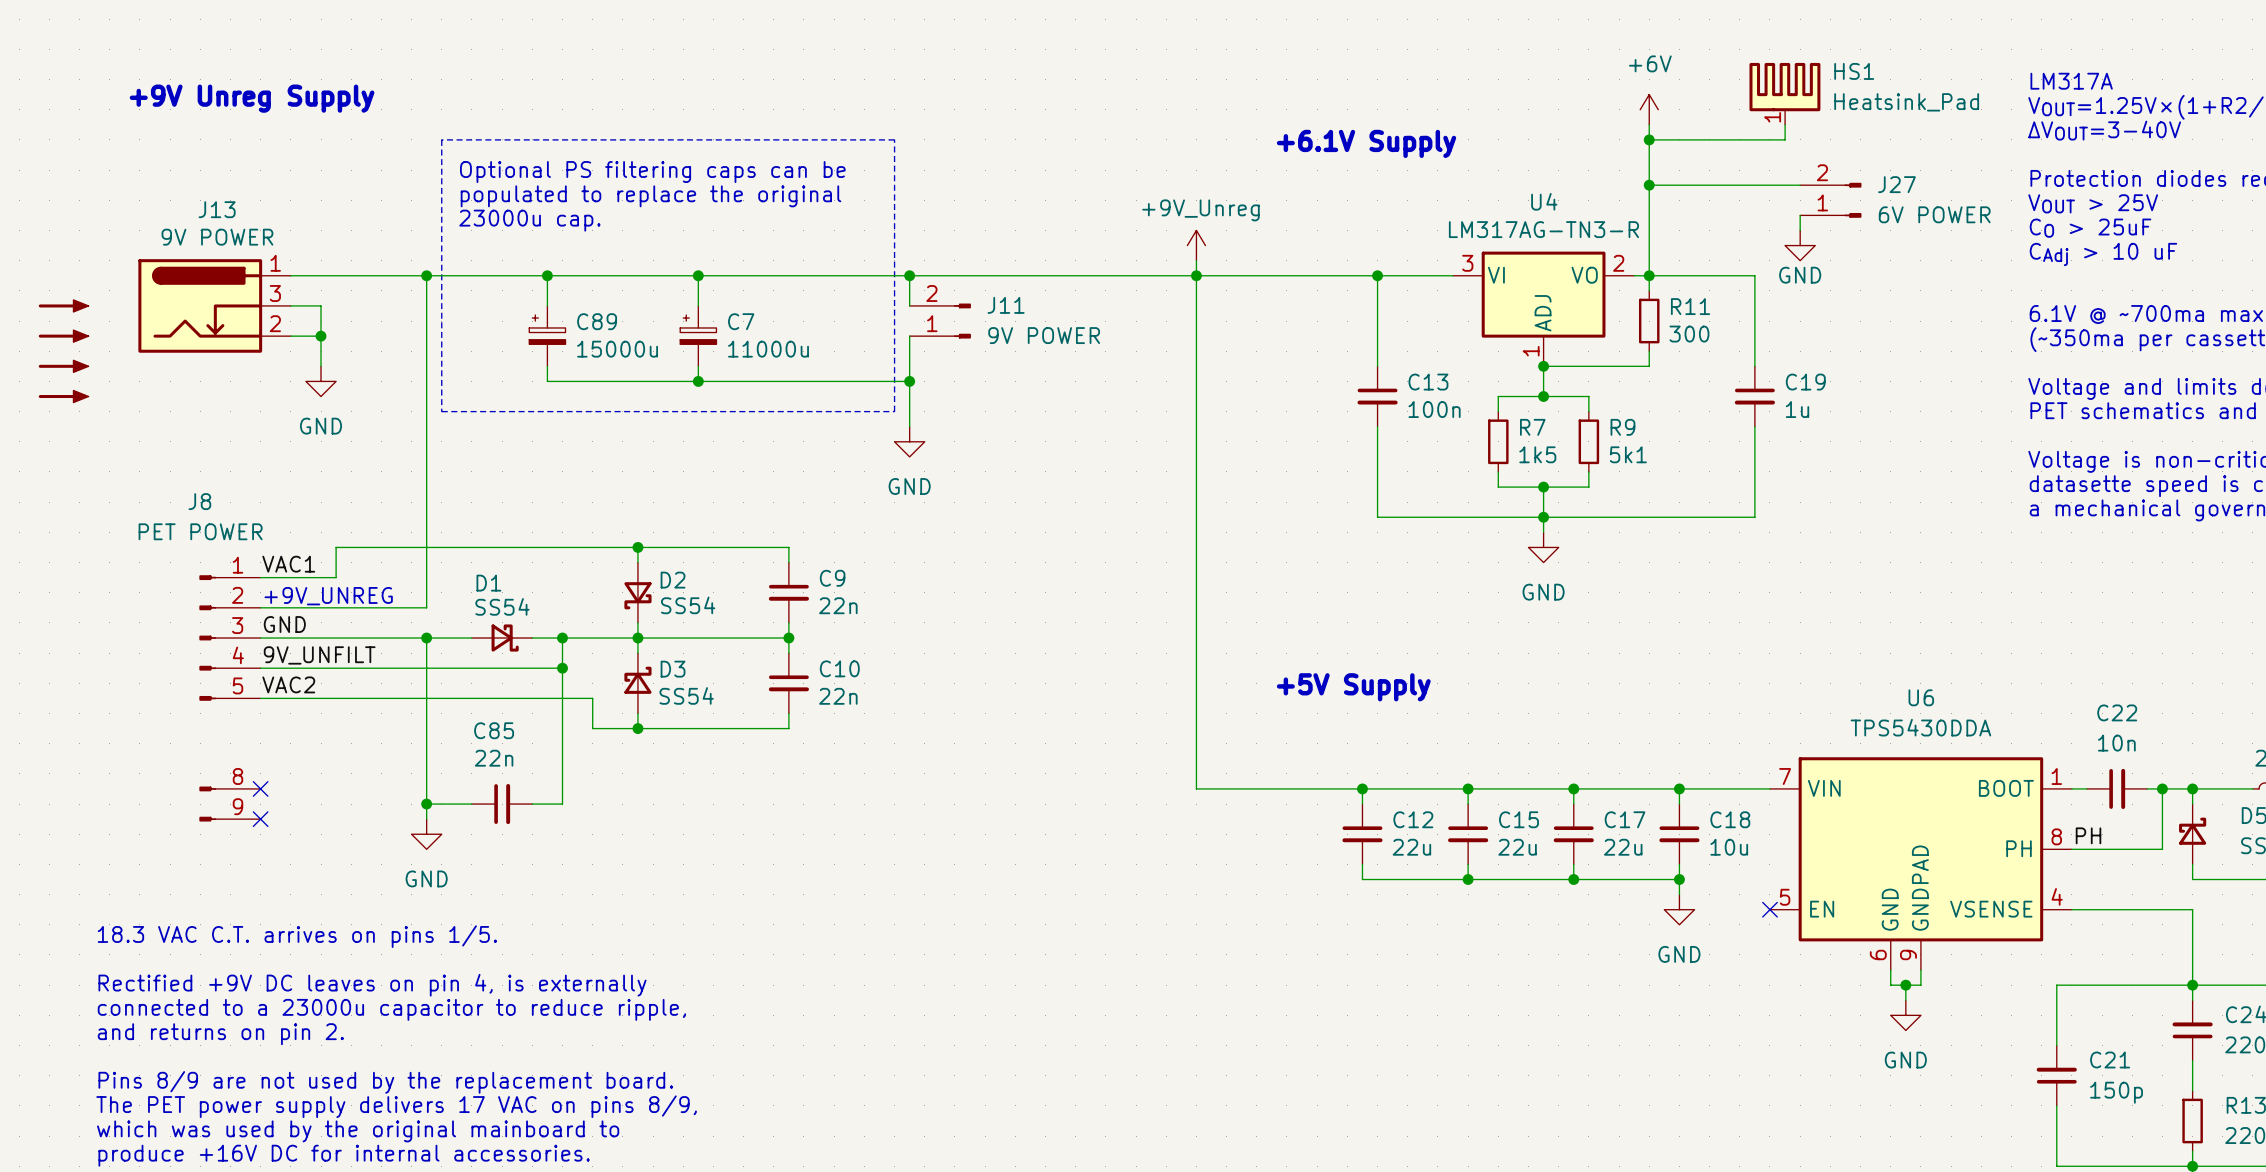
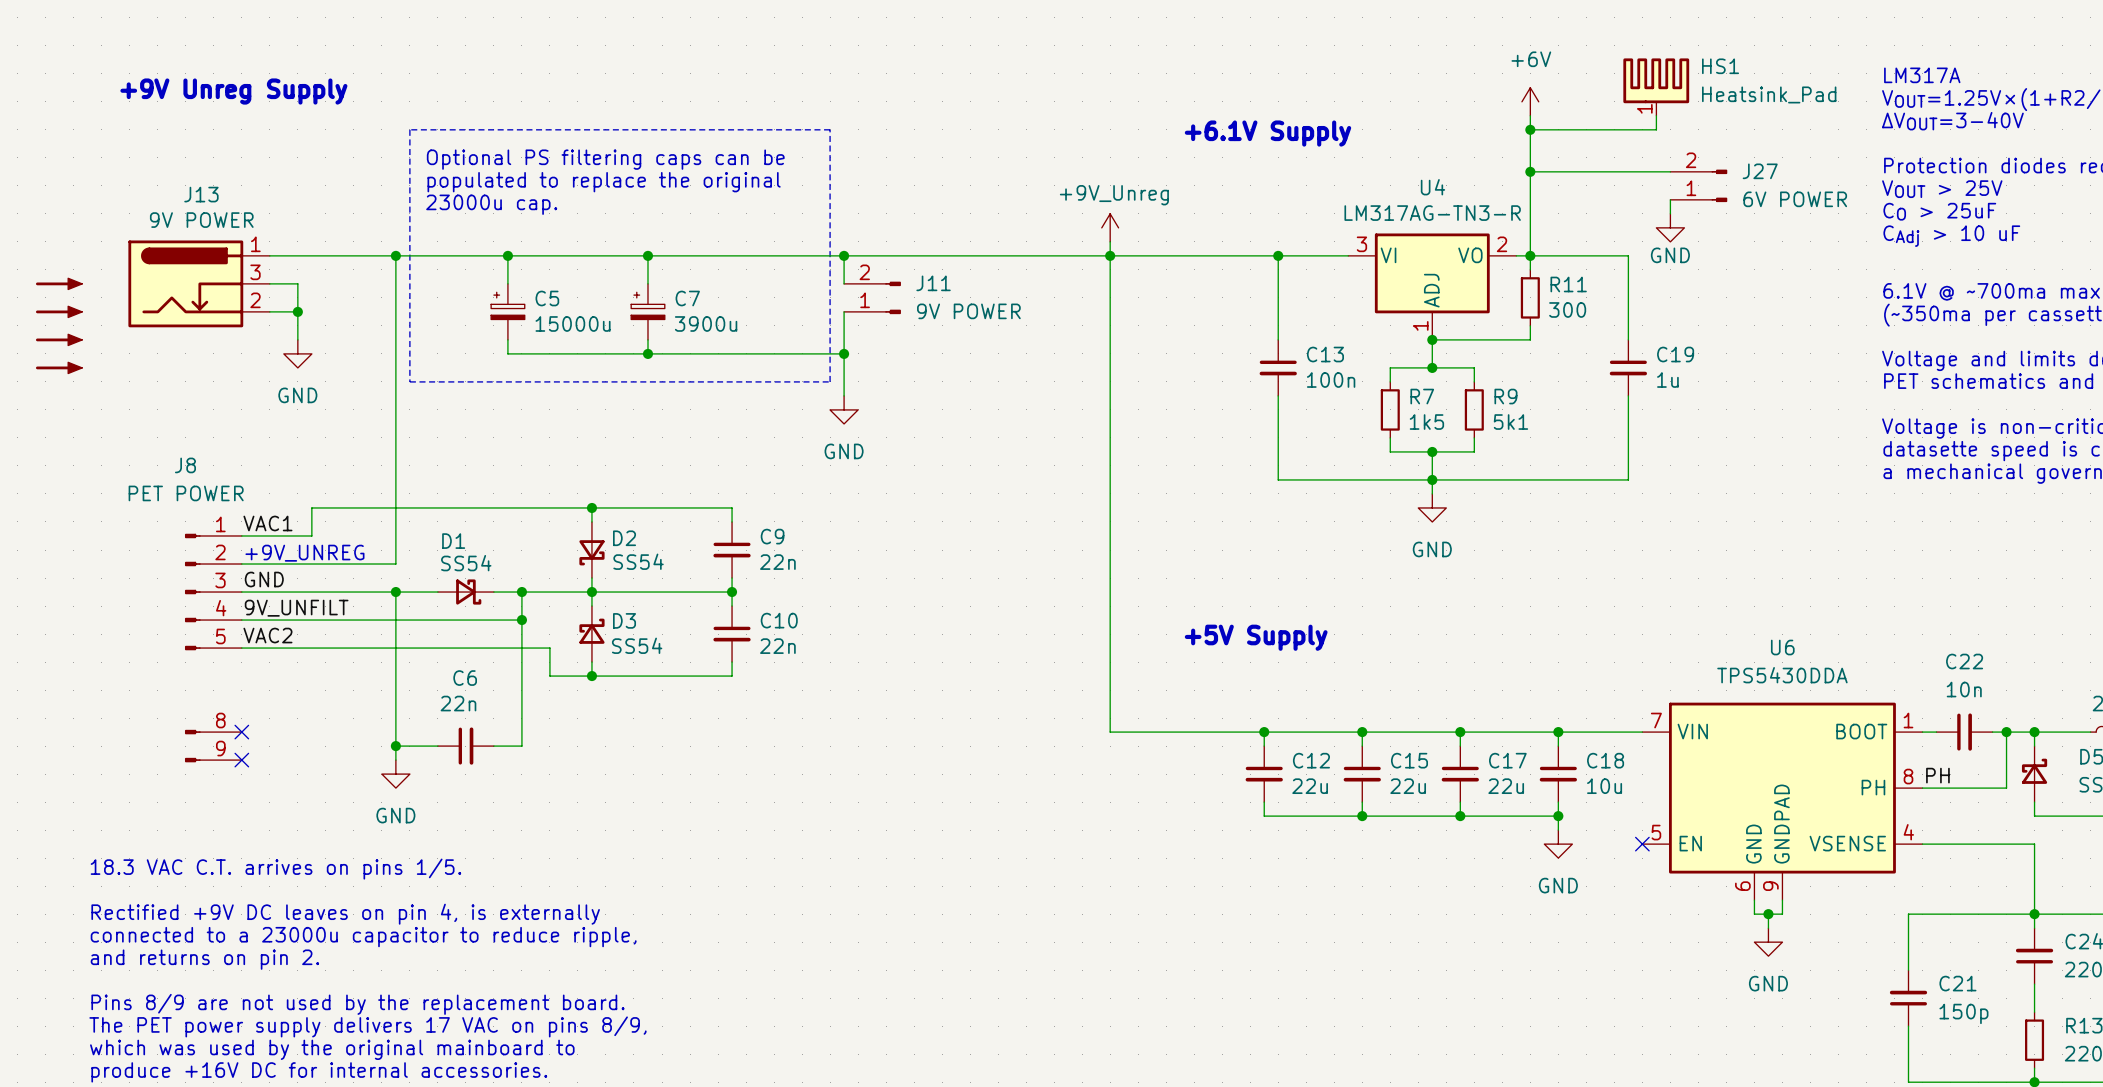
C89 name: C89 (597, 321) -> C5 (547, 298)
C7 value: 11000u (768, 349) -> 3900u (706, 323)
C85 name: C85 (494, 730) -> C6 (465, 678)

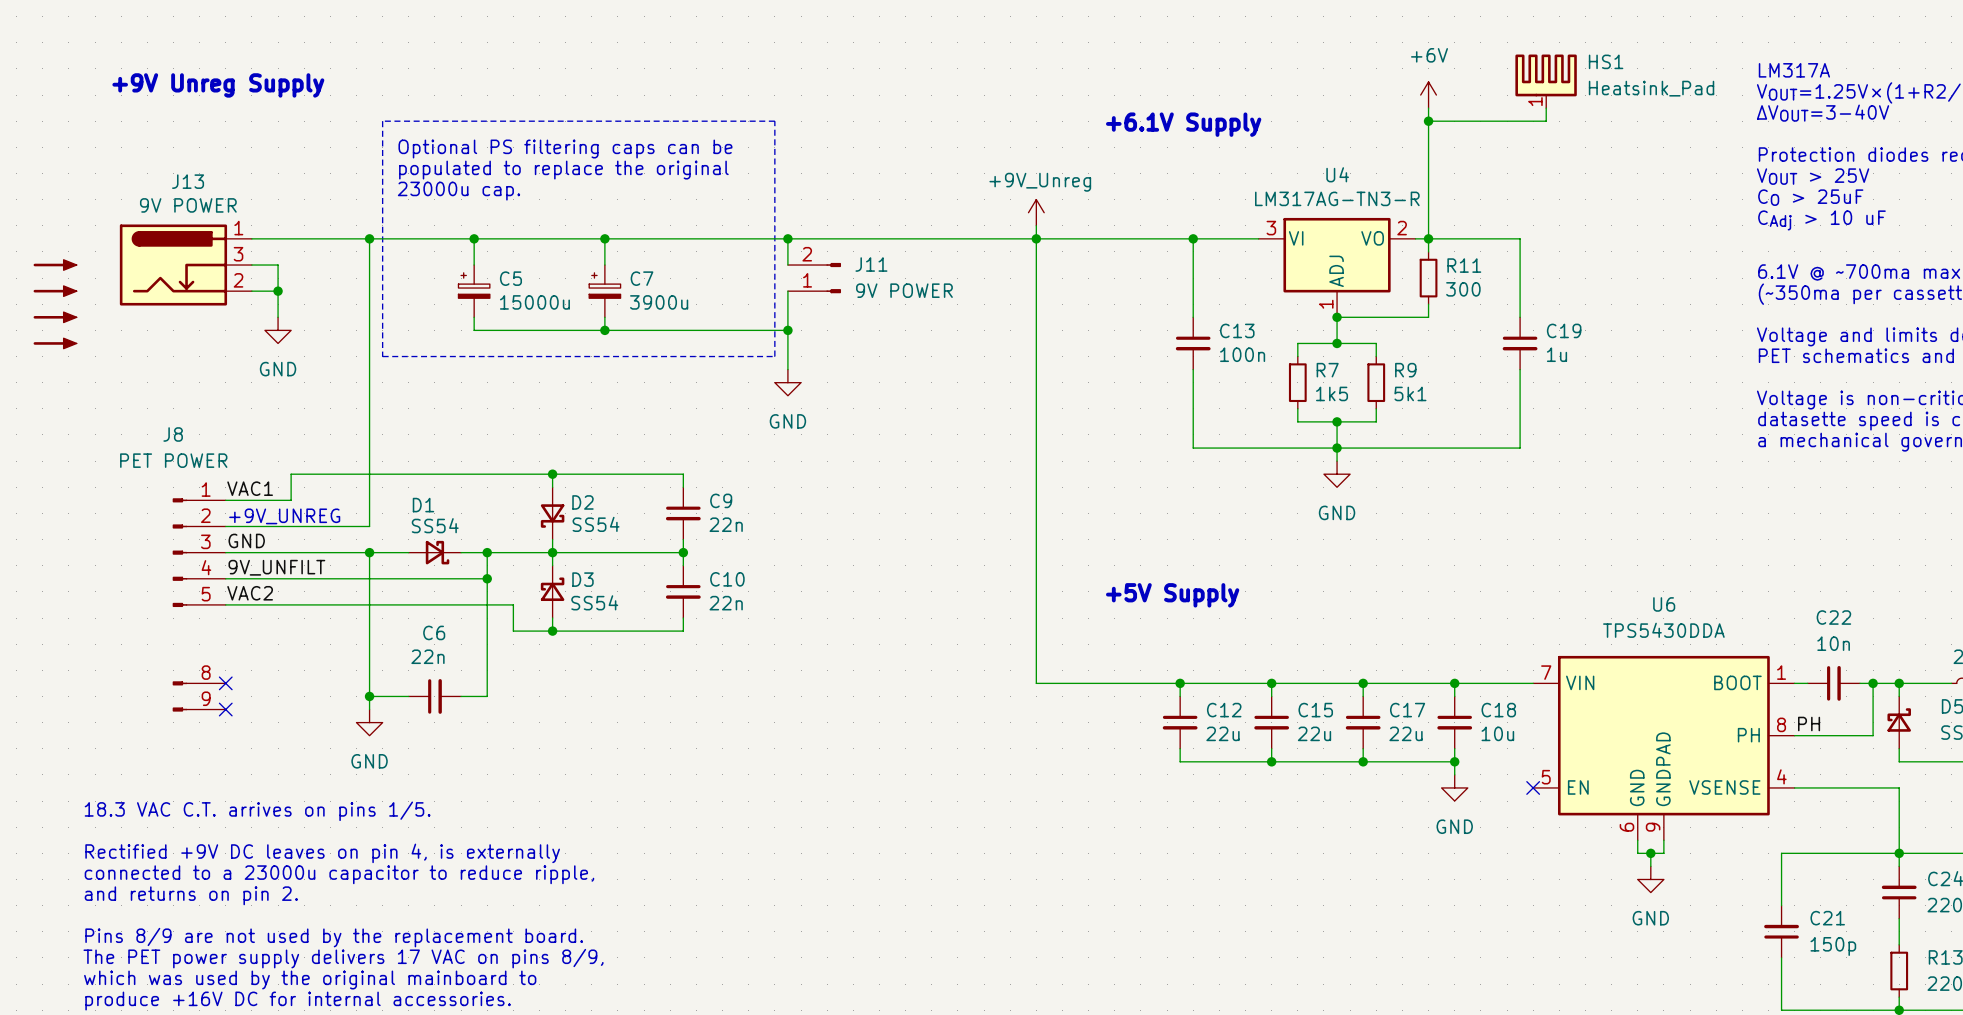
wire: (1530, 171) (1670, 171) -> none
junction: (1530, 171) -> none
J27: 6V POWER (1698, 185) -> none
wire: (1670, 199) (1670, 213) -> none
power symbol: GND (1670, 227) -> none

